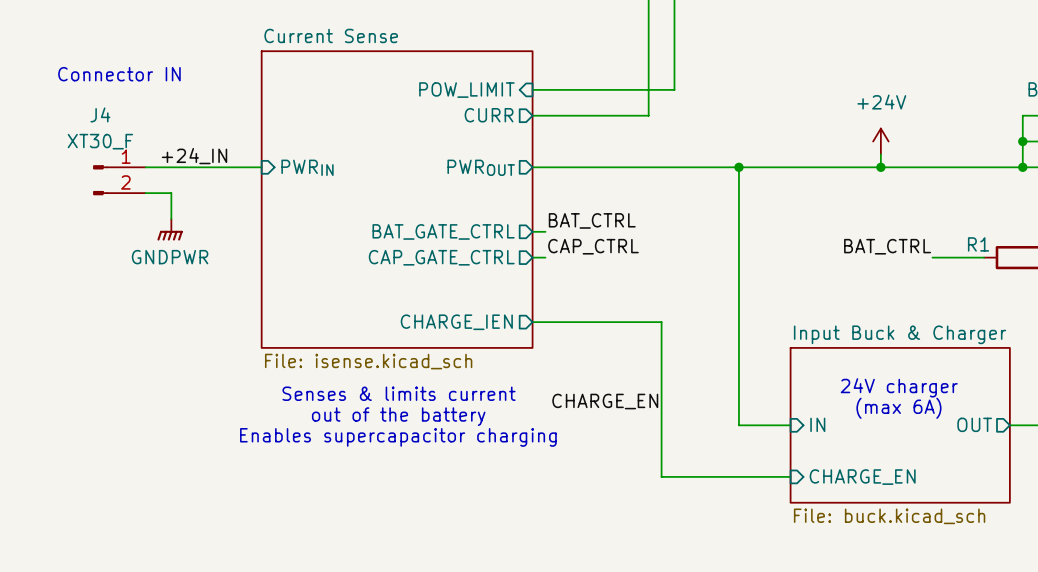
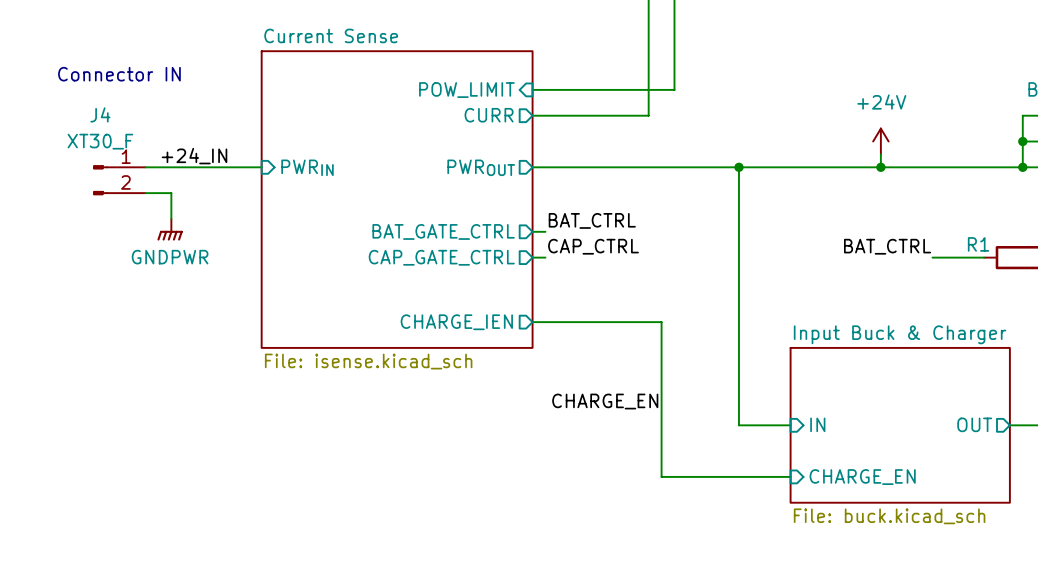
text: 24V charger (899, 387) -> none
text: Senses & limits current (399, 393) -> none
text: (max 6A) (898, 408) -> none
text: out of the battery (398, 416) -> none
text: Enables supercapacitor charging (398, 437) -> none

